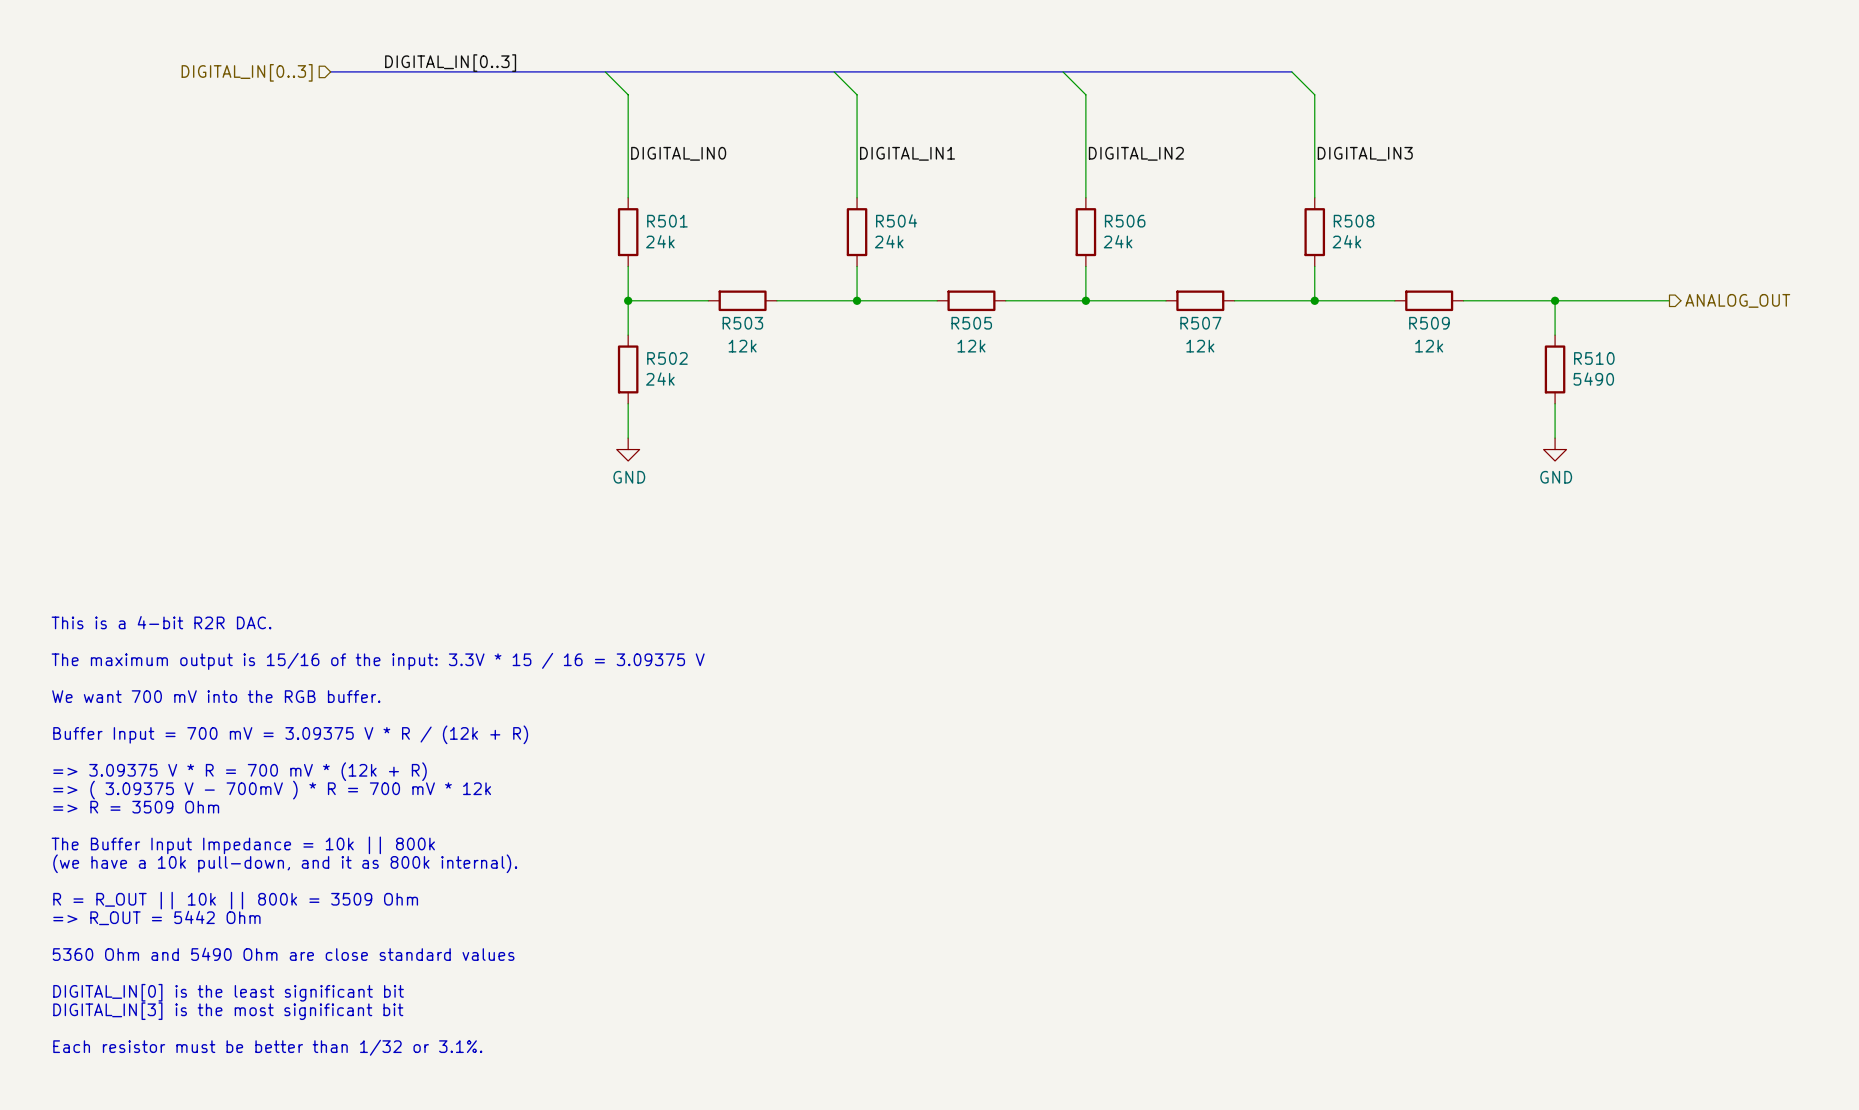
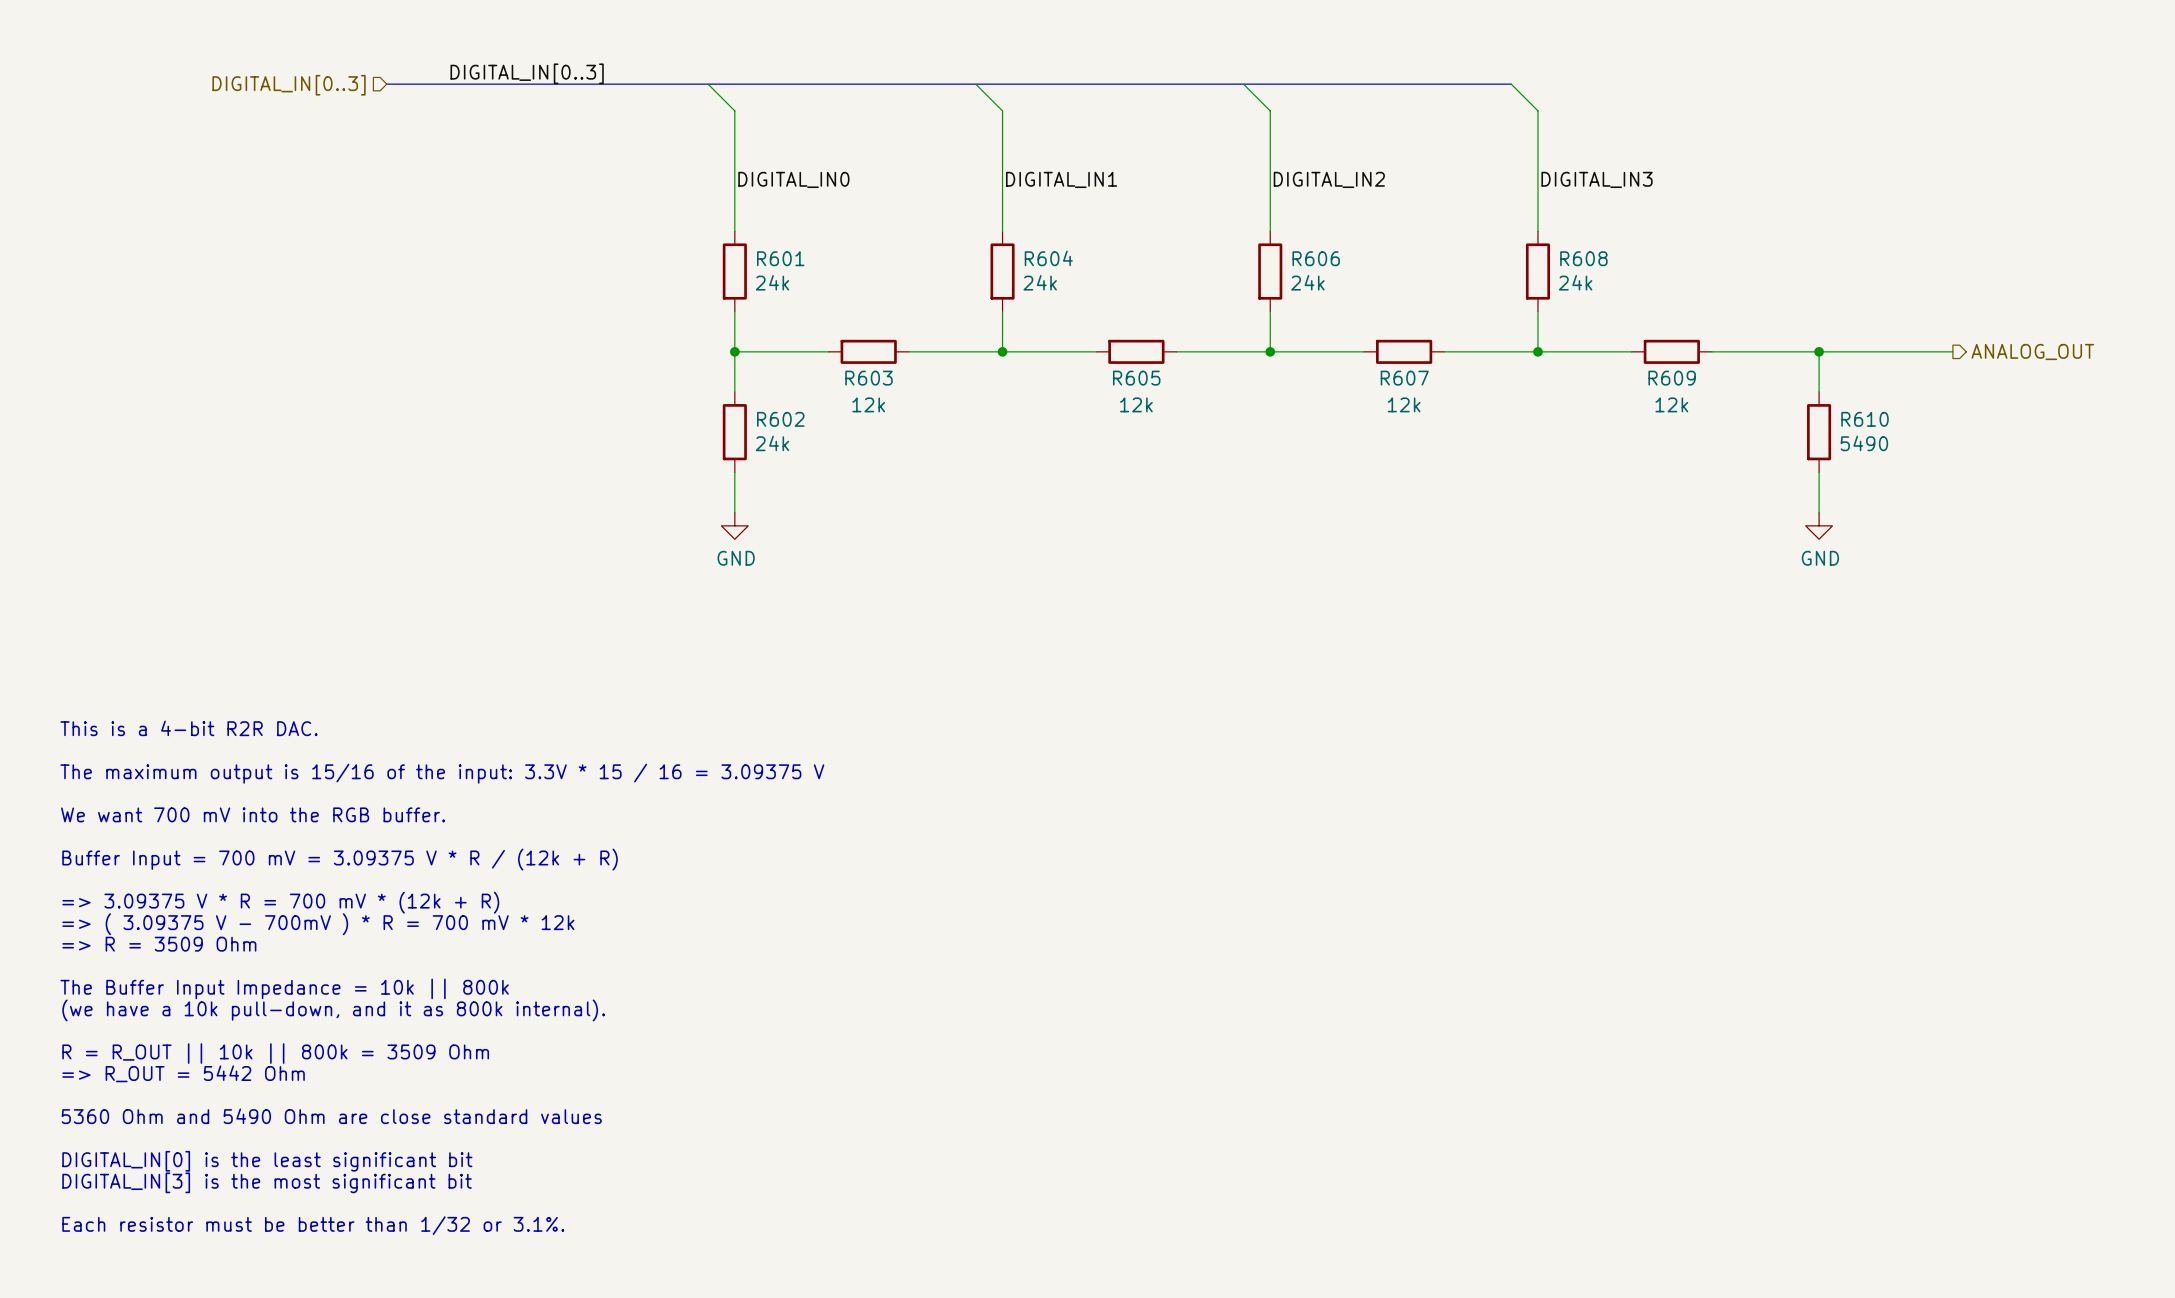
R504 name: R504 (896, 220) -> R604 (1048, 258)
R501 name: R501 (667, 221) -> R601 (780, 258)
R506 name: R506 (1125, 221) -> R606 (1316, 258)
R508 name: R508 (1354, 221) -> R608 (1583, 258)
R503 name: R503 (742, 323) -> R603 (869, 378)
R505 name: R505 (971, 323) -> R605 (1136, 378)
R507 name: R507 (1200, 323) -> R607 (1404, 378)
R509 name: R509 (1429, 323) -> R609 (1672, 378)
R502 name: R502 (667, 358) -> R602 (780, 419)
R510 name: R510 (1594, 358) -> R610 (1865, 419)

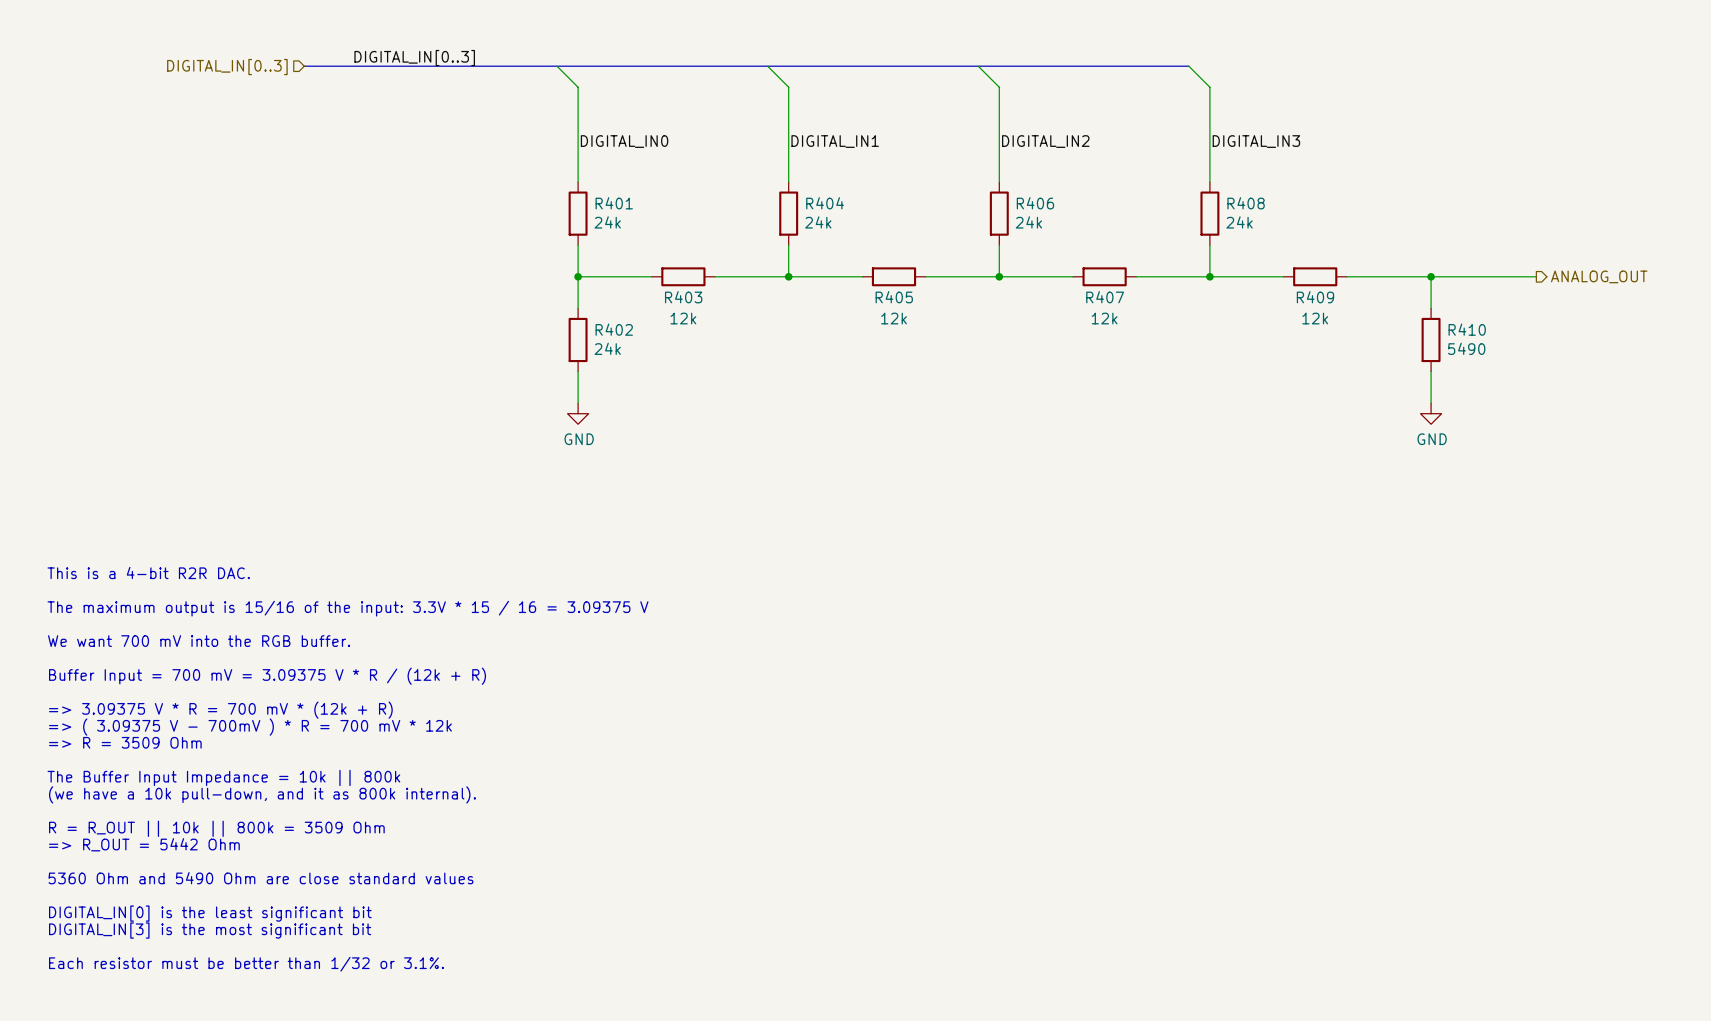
R601 name: R601 (780, 258) -> R401 (614, 203)
R604 name: R604 (1048, 258) -> R404 (825, 203)
R606 name: R606 (1316, 258) -> R406 (1035, 203)
R608 name: R608 (1583, 258) -> R408 (1246, 203)
R603 name: R603 (869, 378) -> R403 (683, 297)
R605 name: R605 (1136, 378) -> R405 (894, 297)
R607 name: R607 (1404, 378) -> R407 (1105, 297)
R609 name: R609 (1672, 378) -> R409 (1315, 297)
R602 name: R602 (780, 419) -> R402 (614, 329)
R610 name: R610 (1865, 419) -> R410 (1467, 329)

